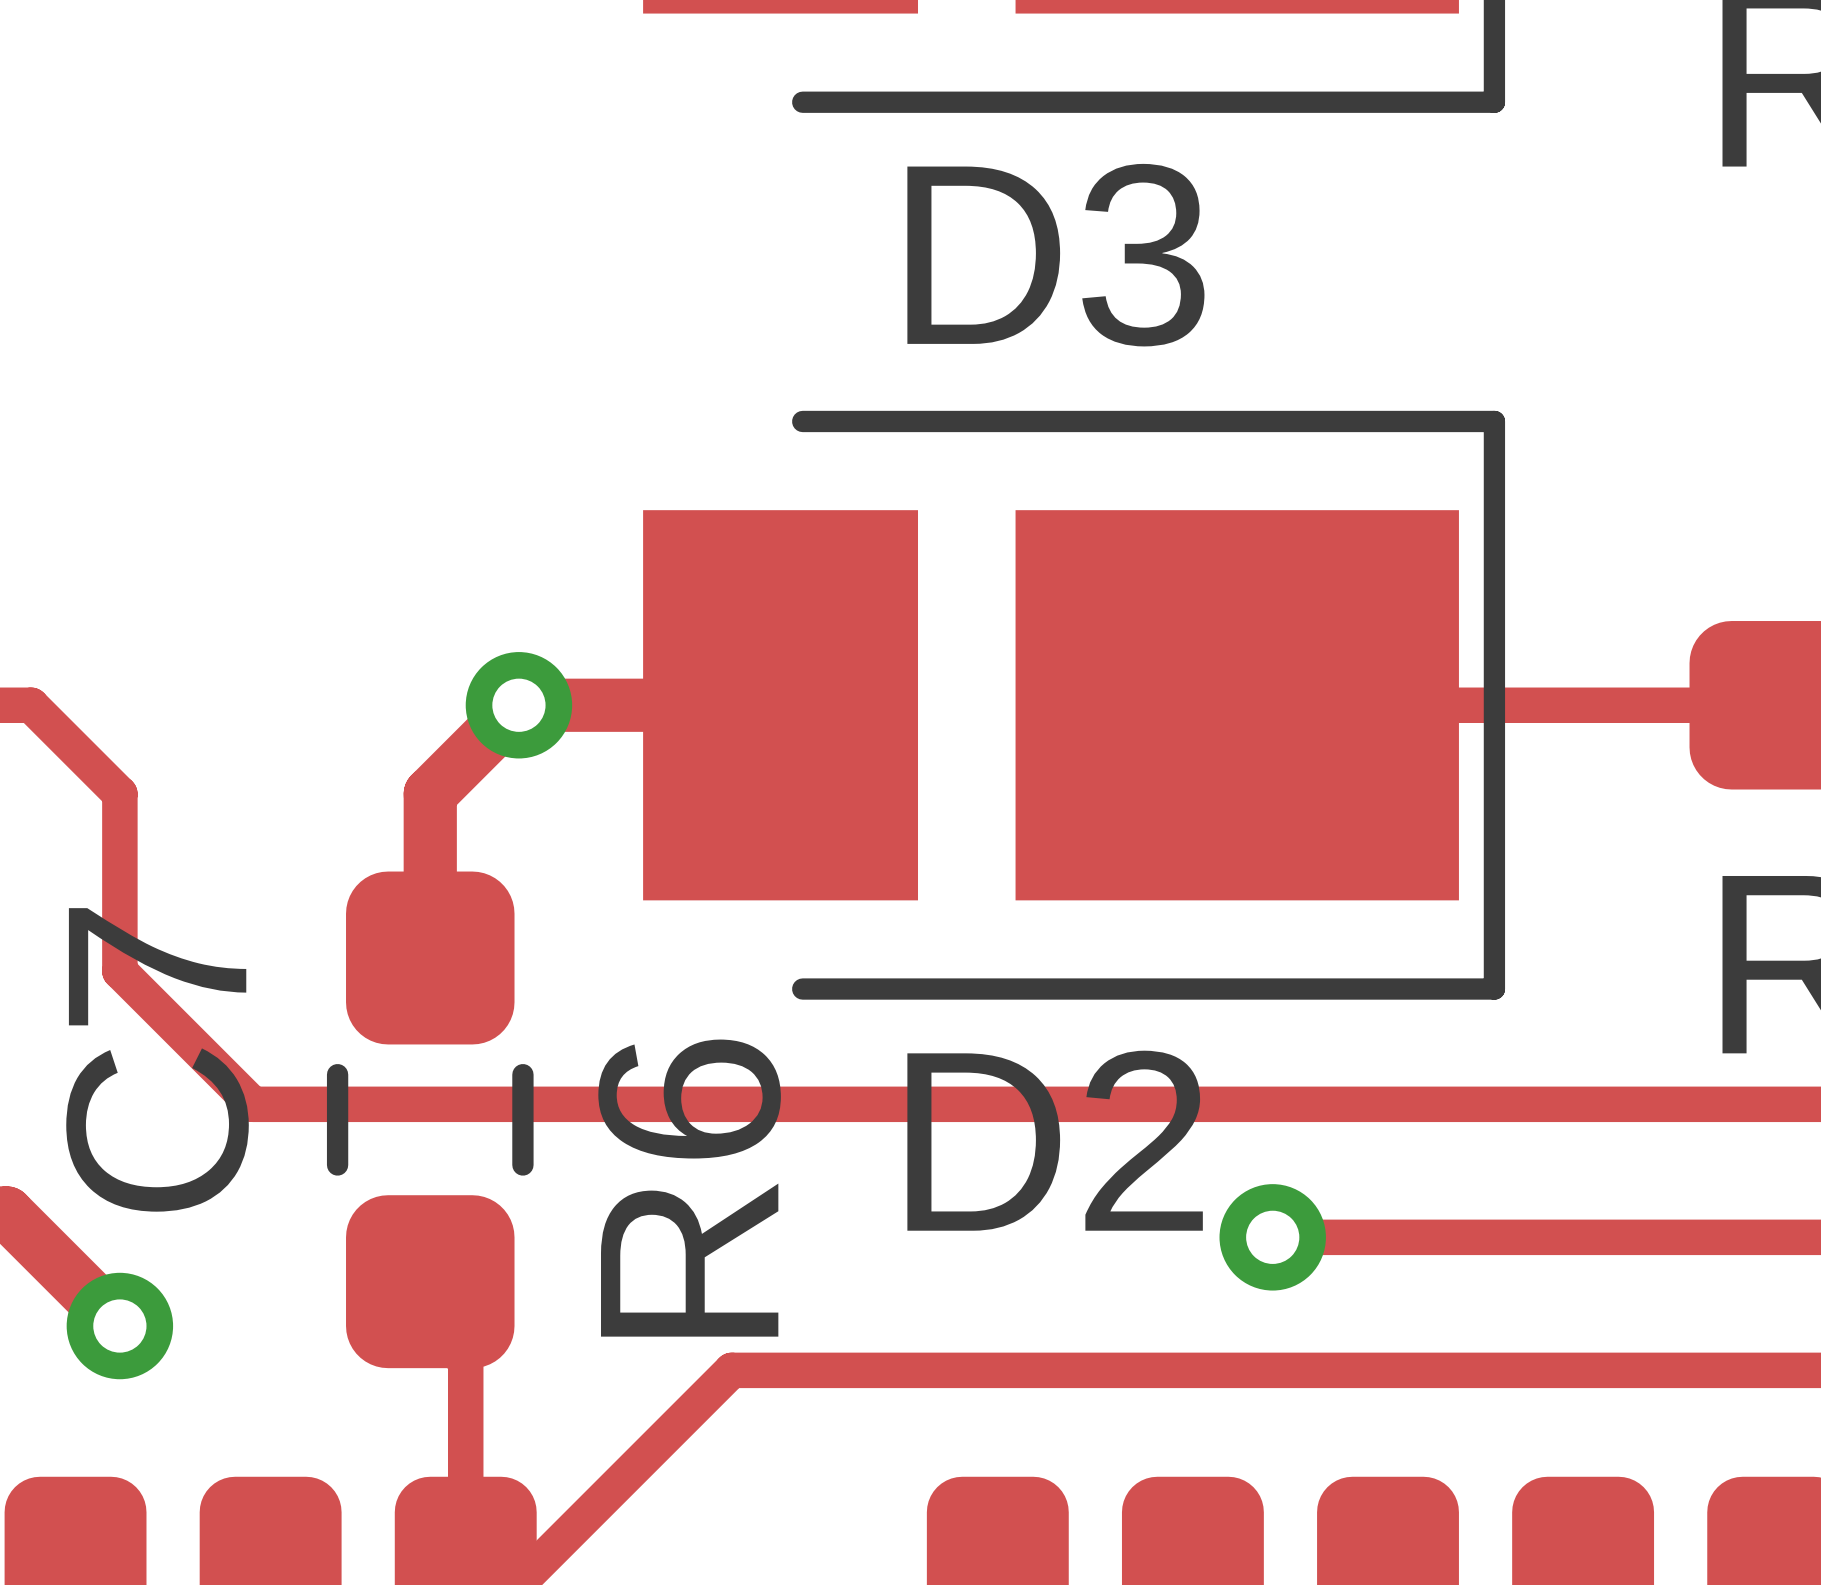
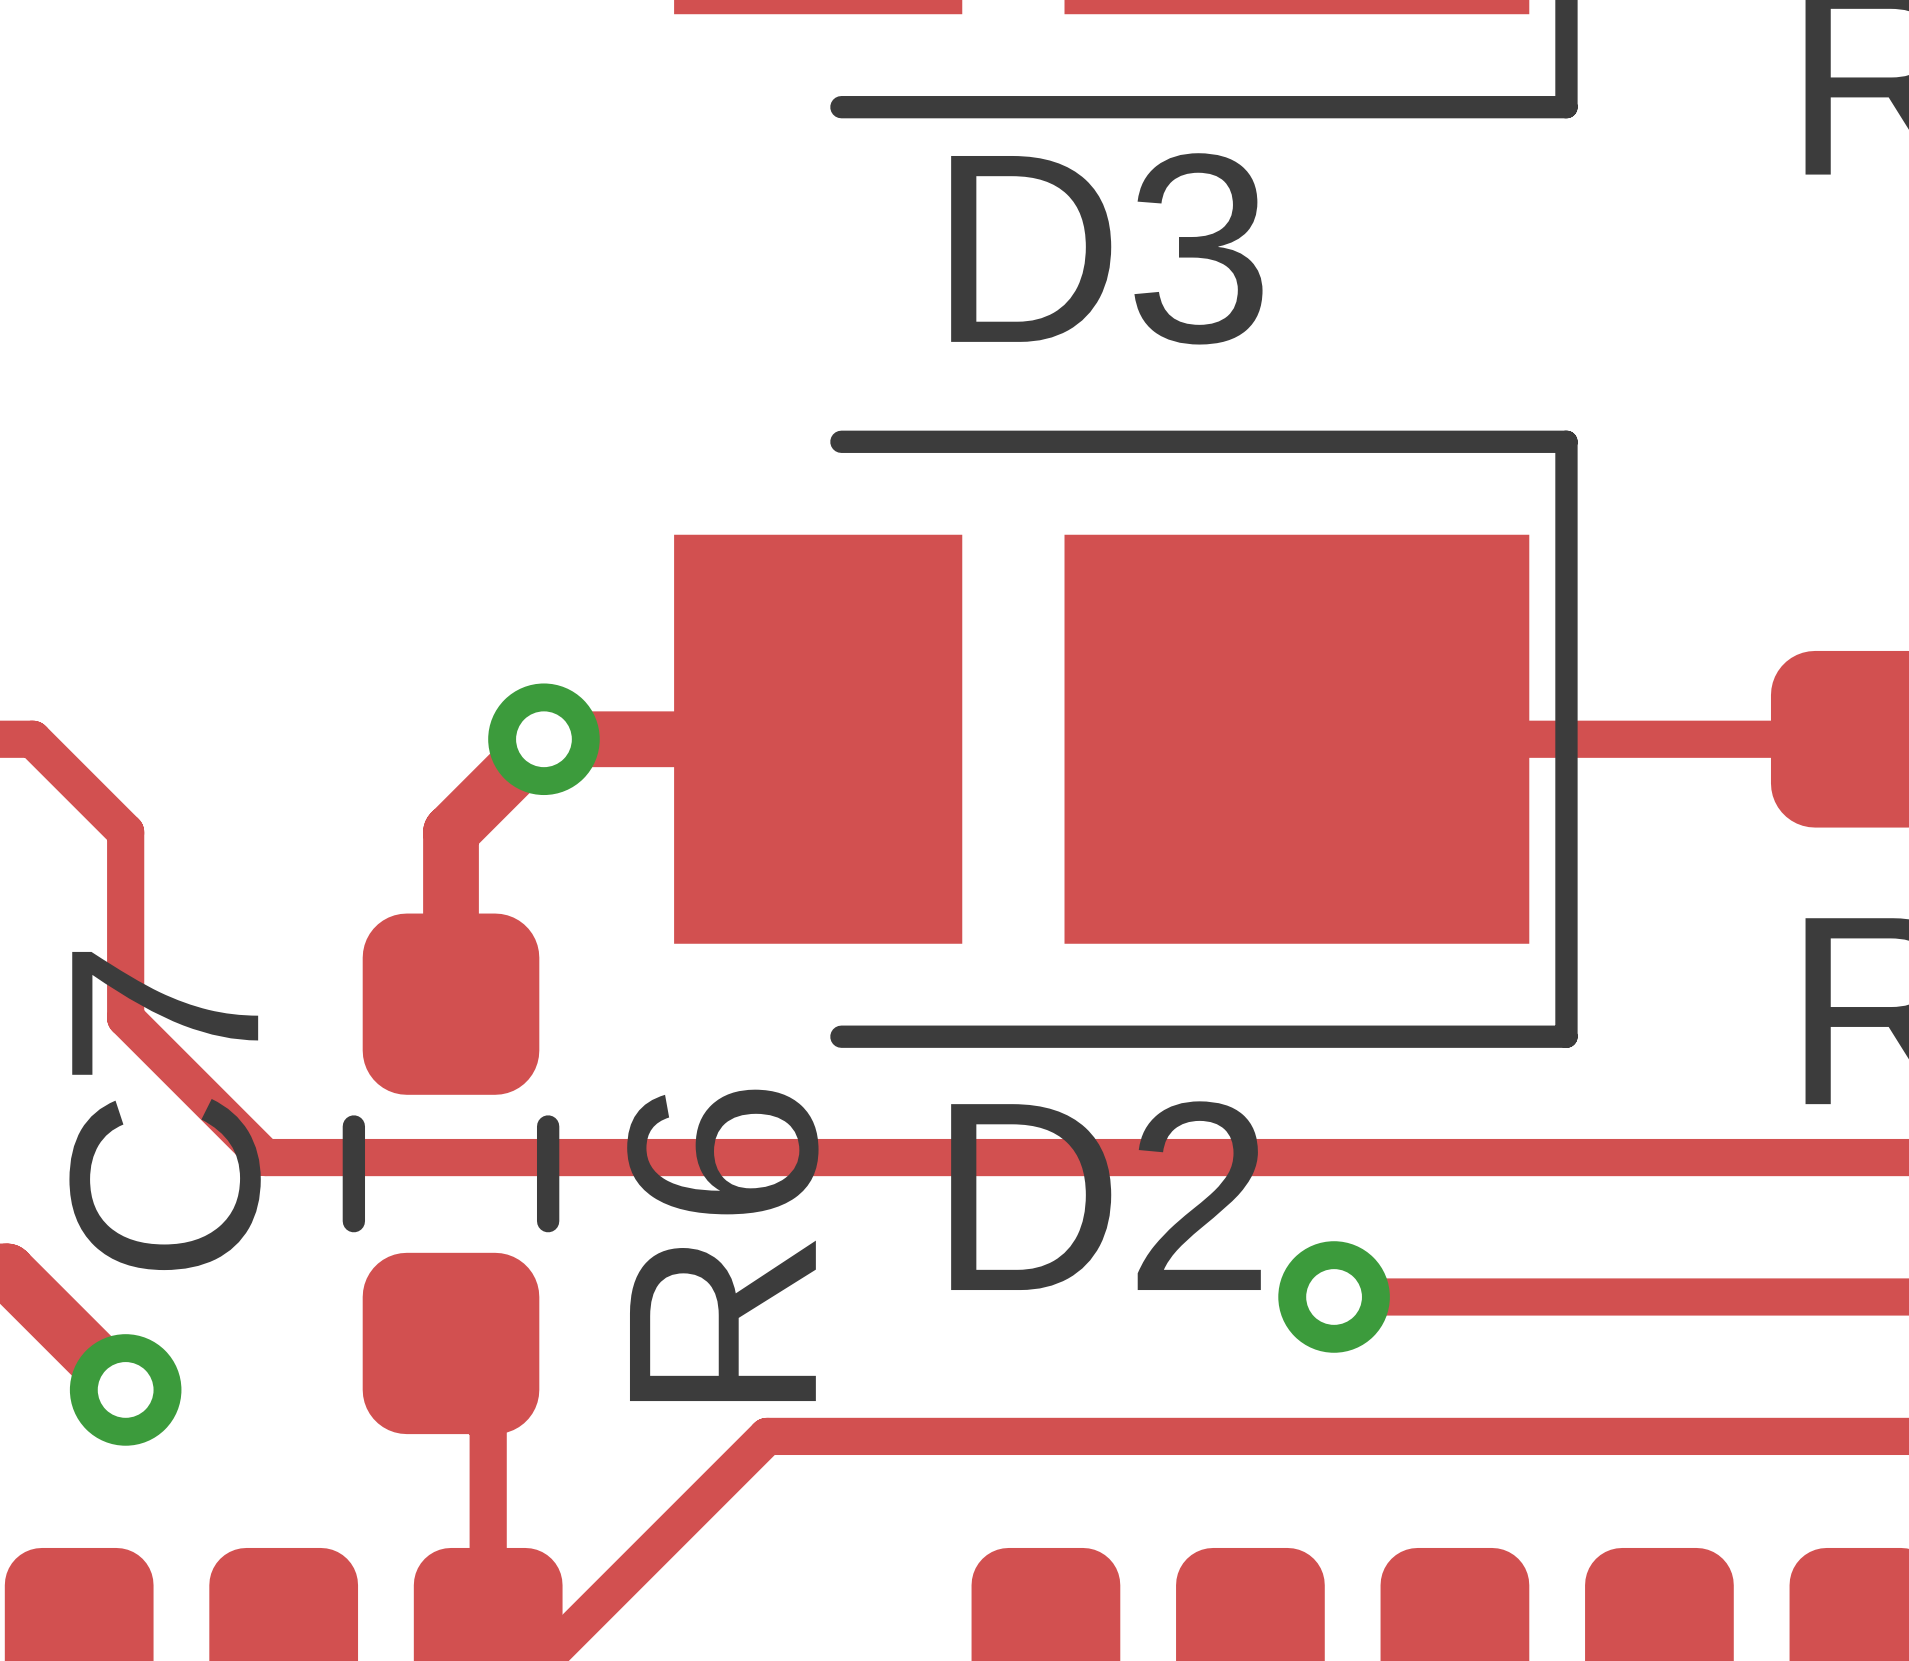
D3 name position: D3 (1055, 255) -> D3 (1106, 248)

